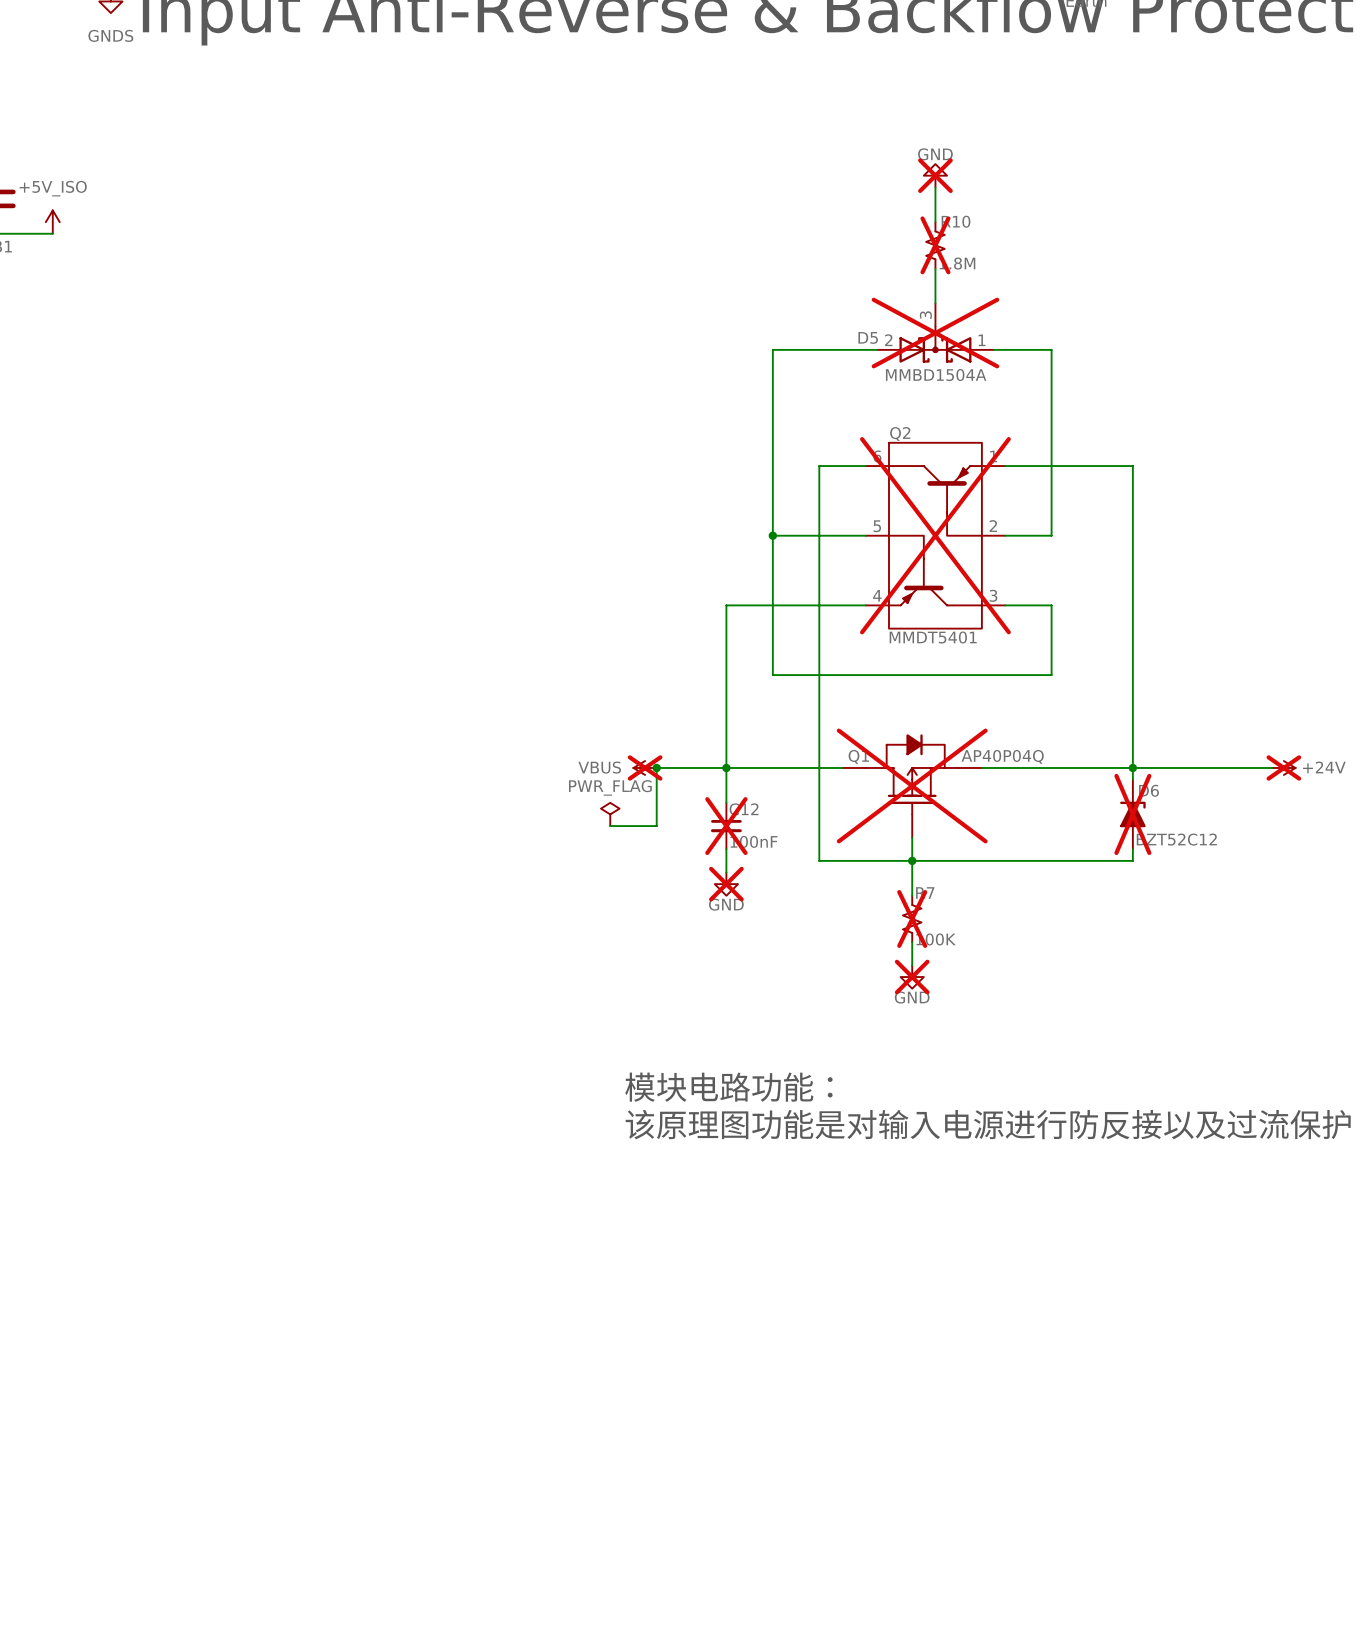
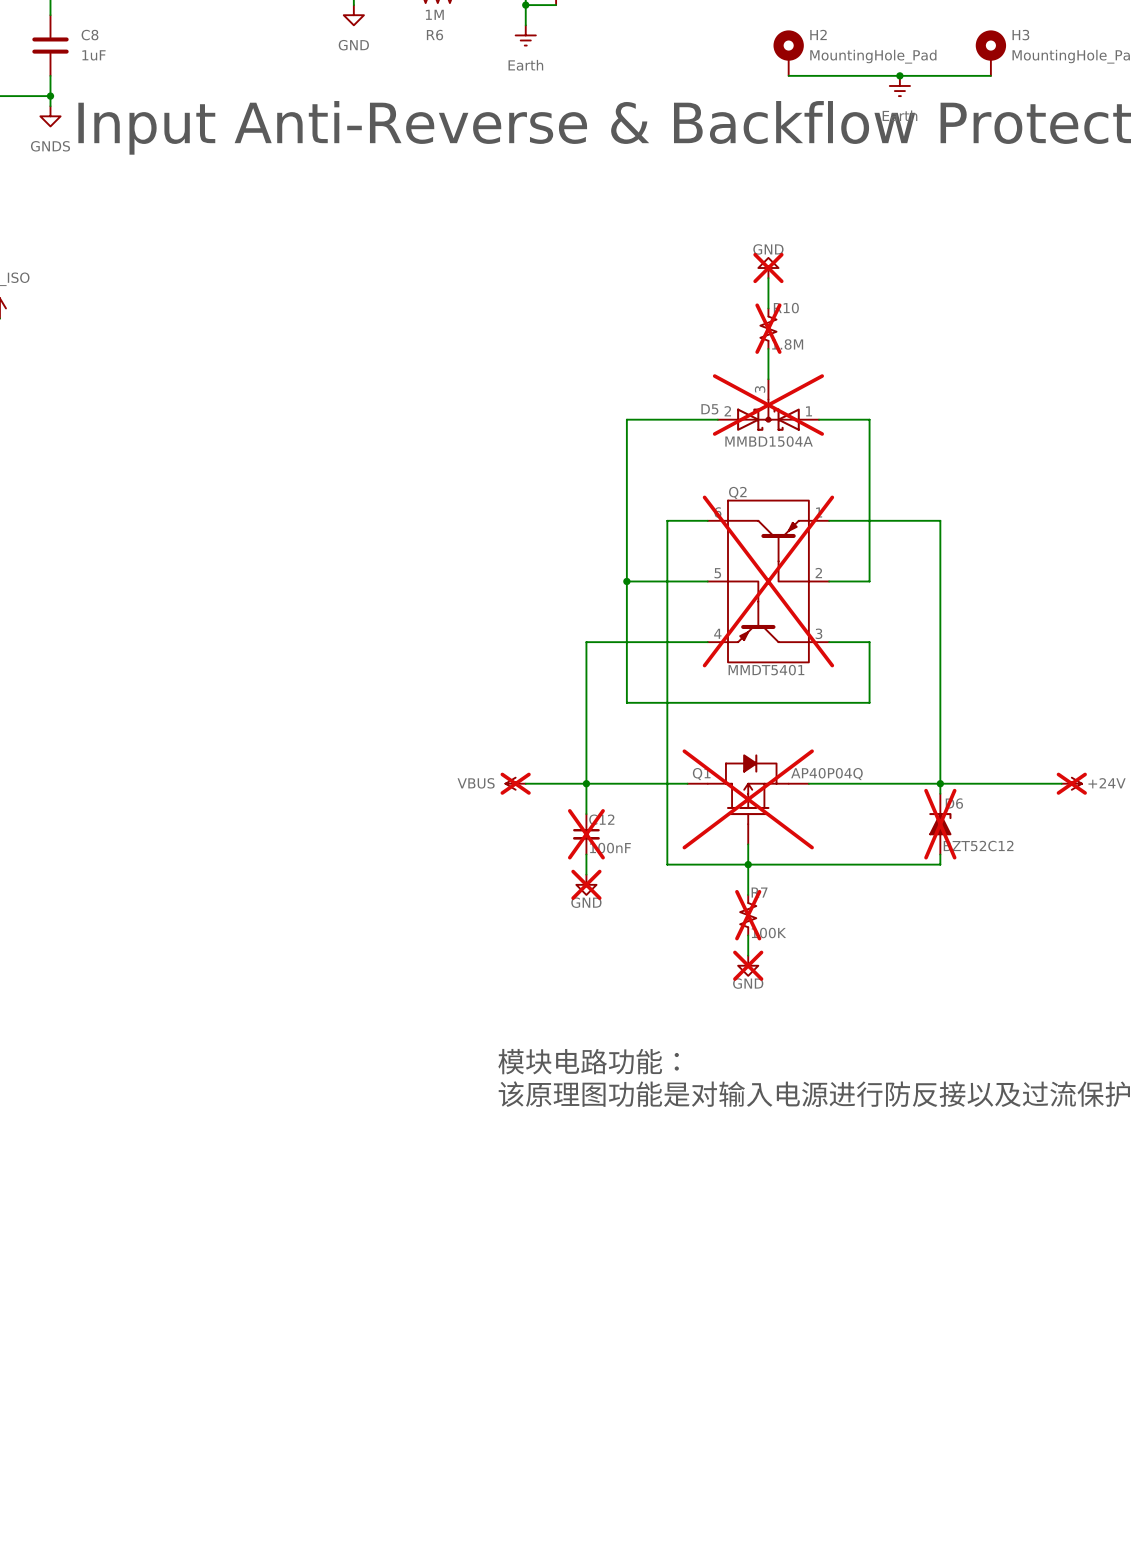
wire: (656, 767) (656, 826) (610, 826) -> none
junction: (656, 767) -> none
power symbol: PWR_FLAG (610, 814) -> none

